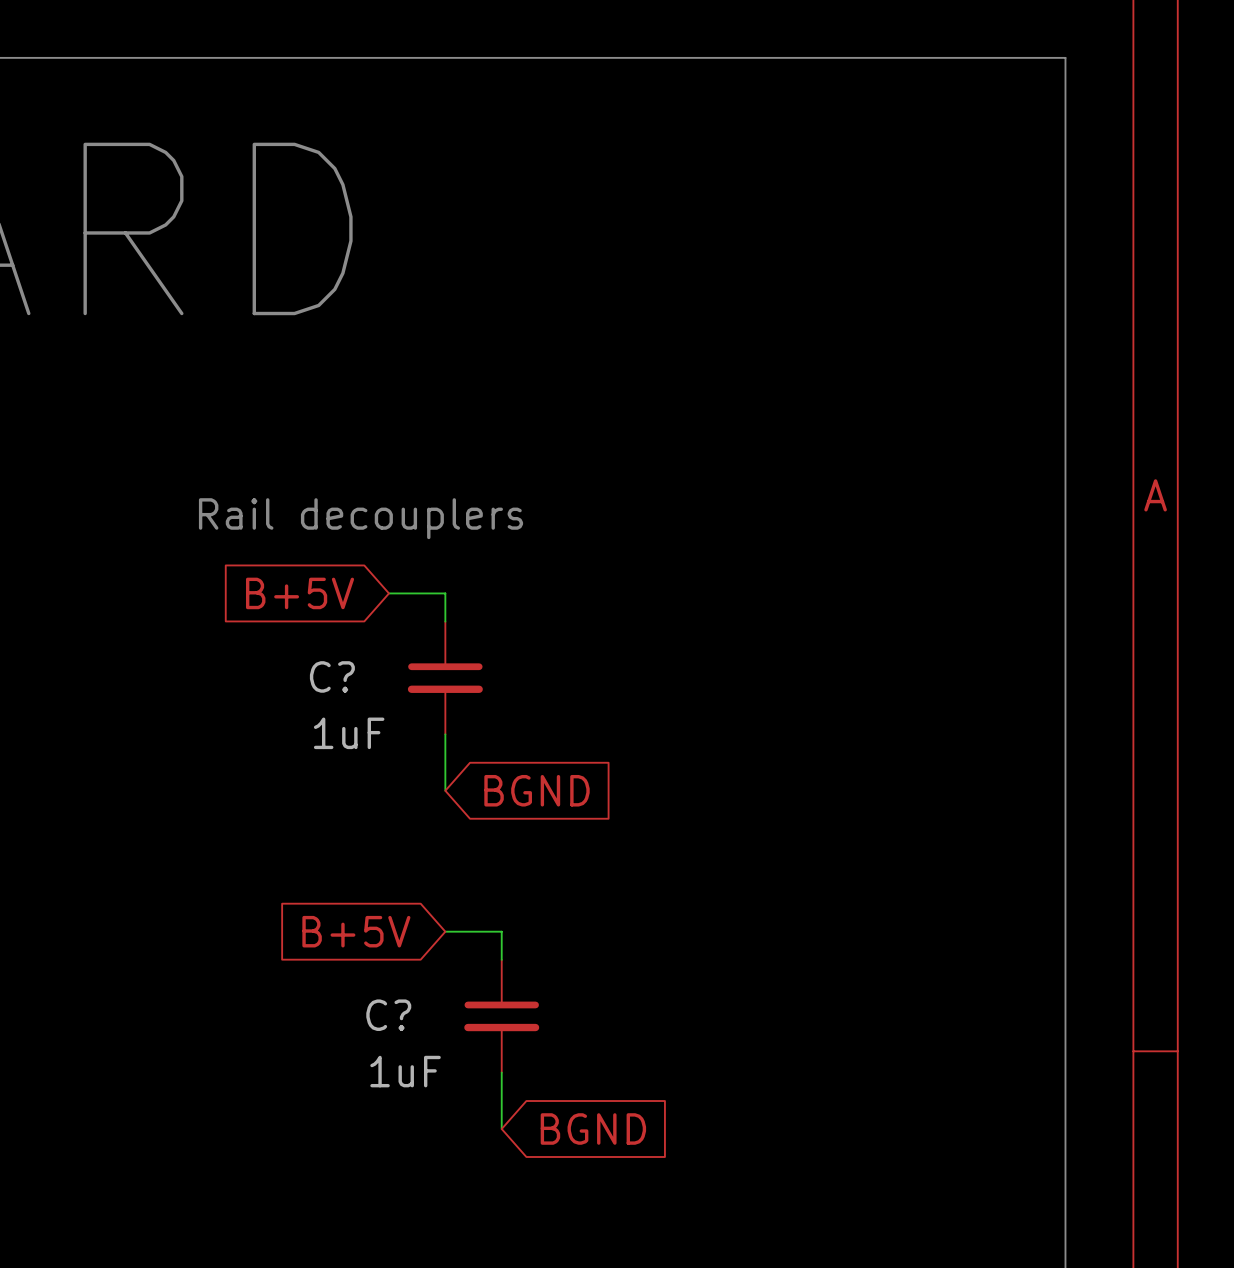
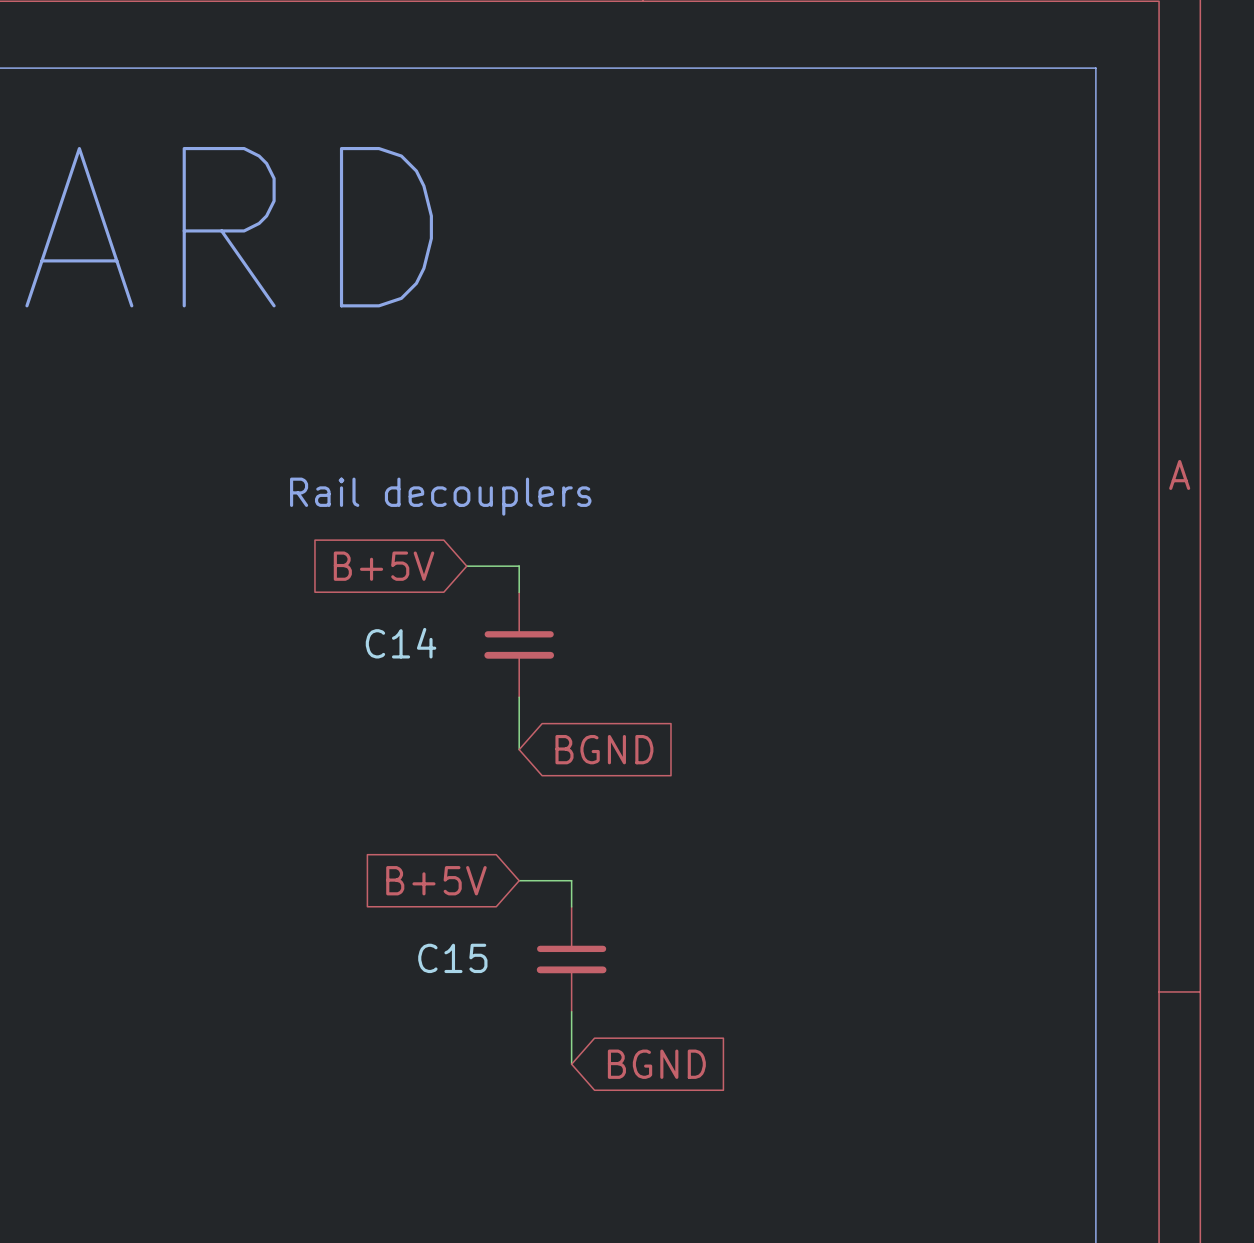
C? name: C? (332, 676) -> C14 (401, 643)
C? value: 1uF (349, 733) -> none
C? name: C? (388, 1015) -> C15 (452, 958)
C? value: 1uF (405, 1071) -> none

